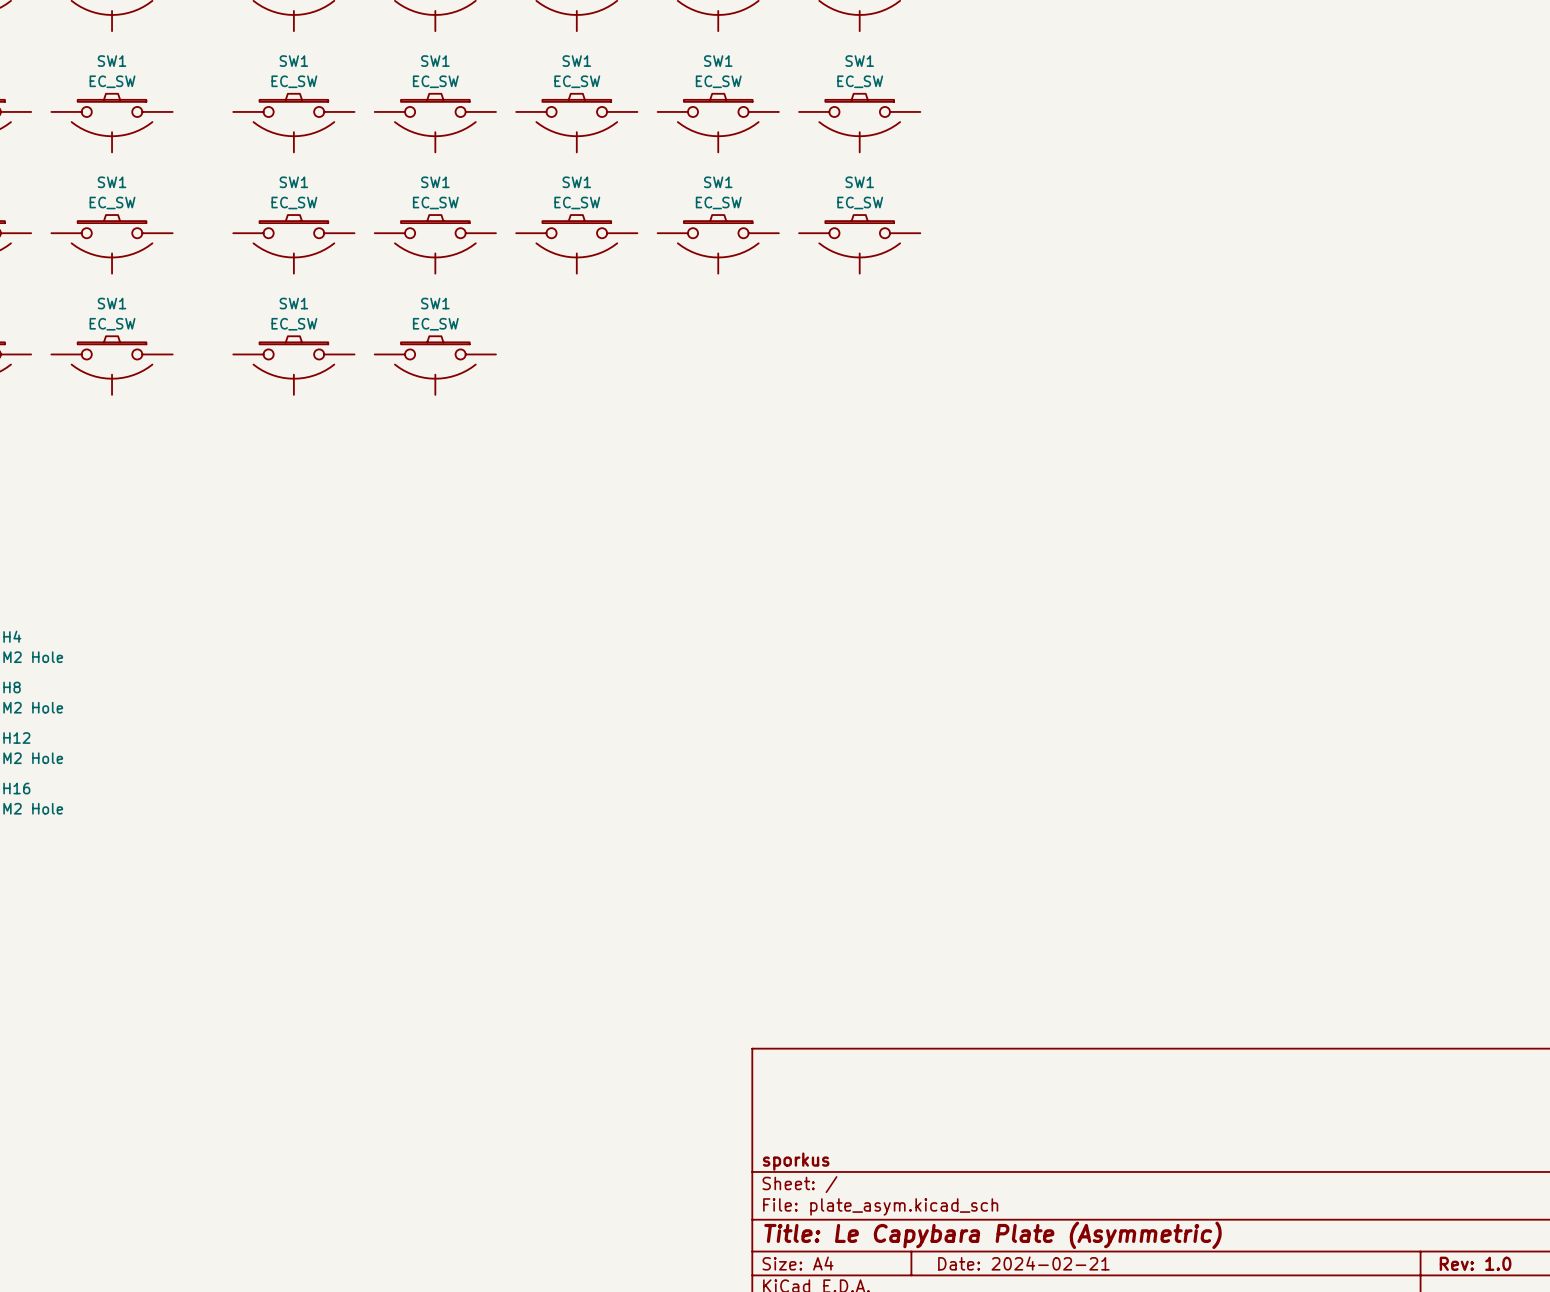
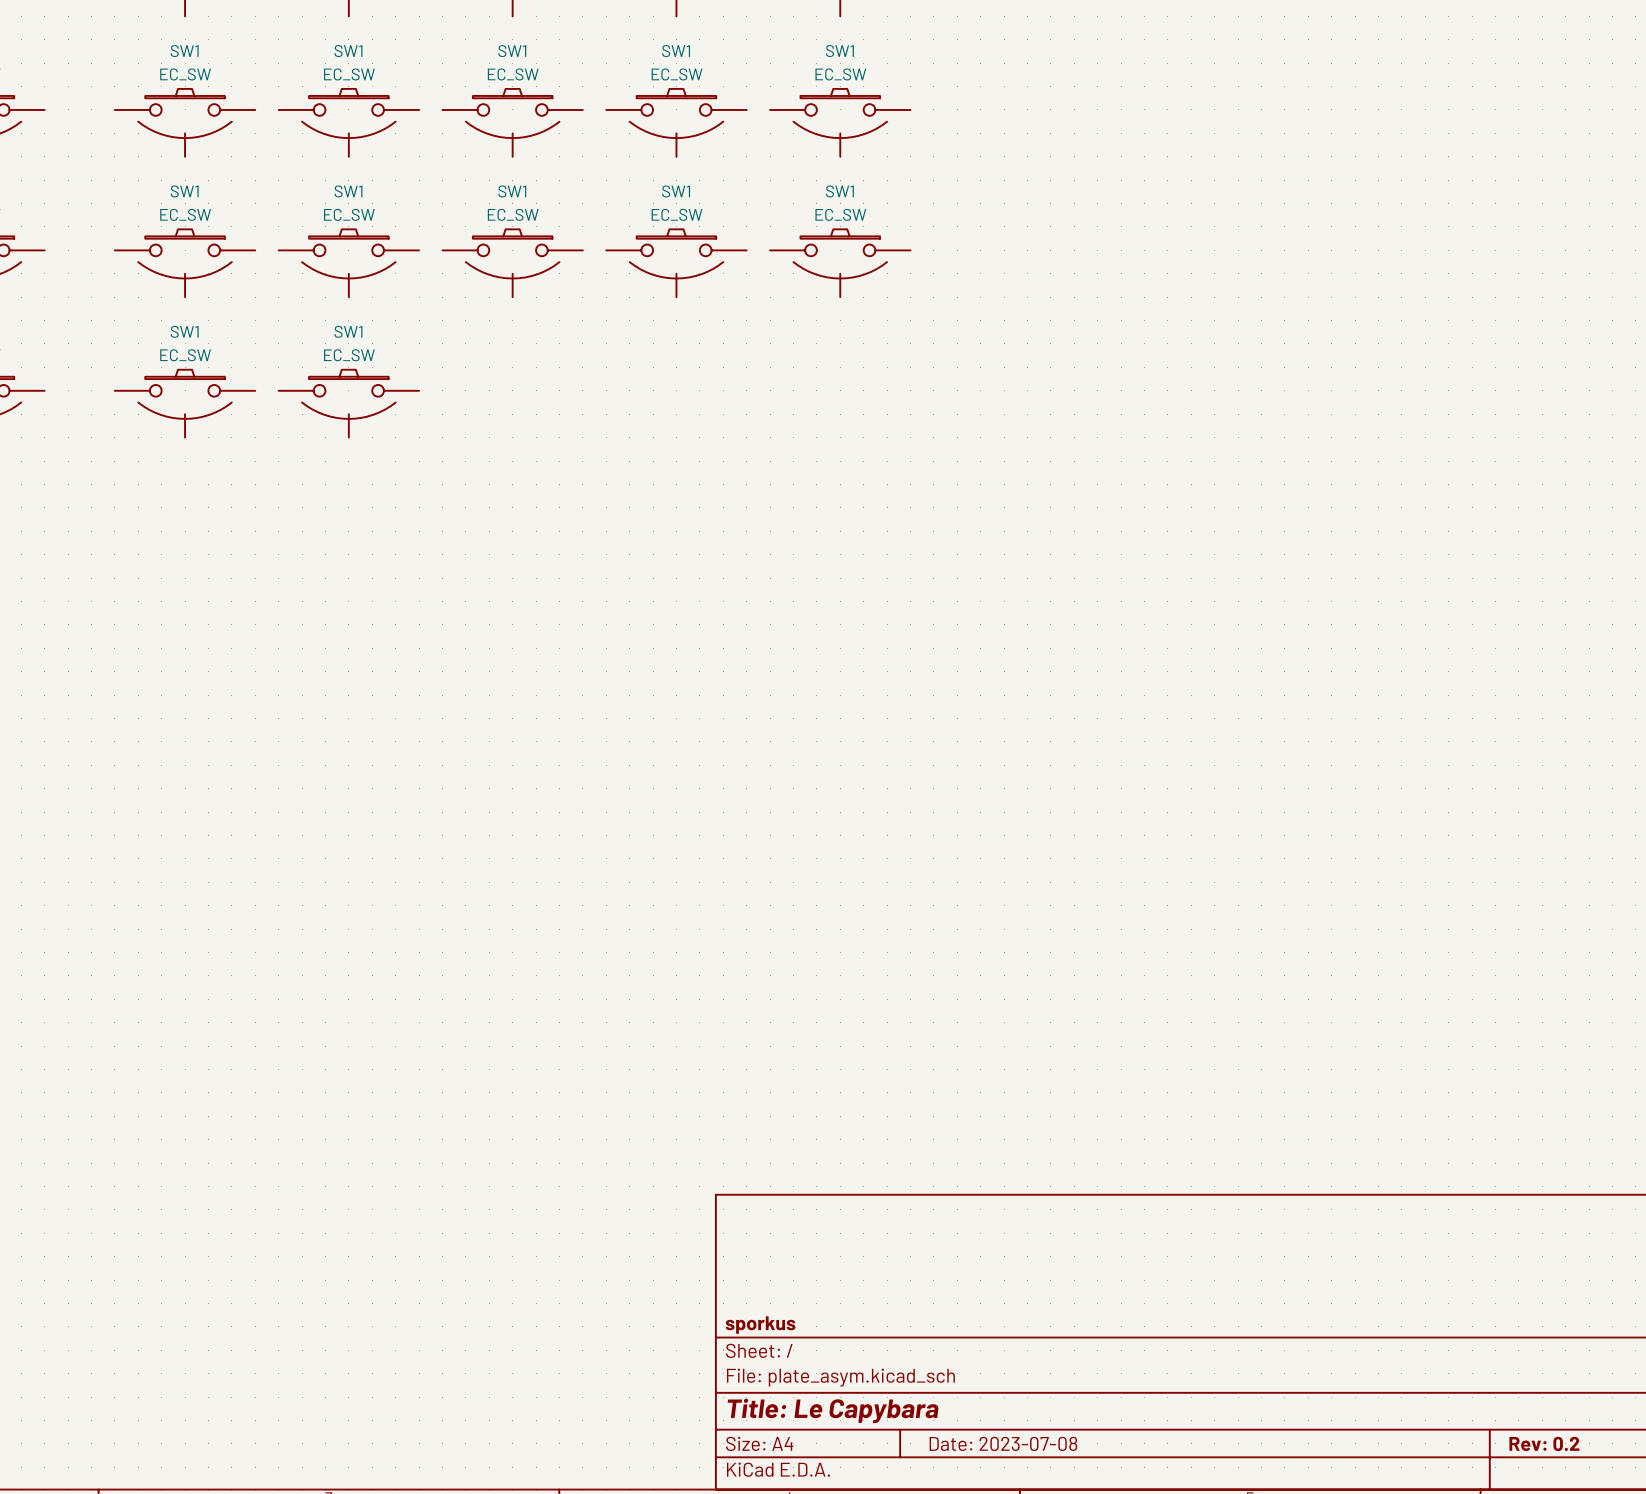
title block: Title: Le Capybara Plate (Asymmetric) (993, 1235) -> Title: Le Capybara (833, 1410)
title block: Date: 2024-02-21 (1023, 1263) -> Date: 2023-07-08 (1003, 1443)
title block: Rev: 1.0 (1475, 1263) -> Rev: 0.2 (1544, 1443)

